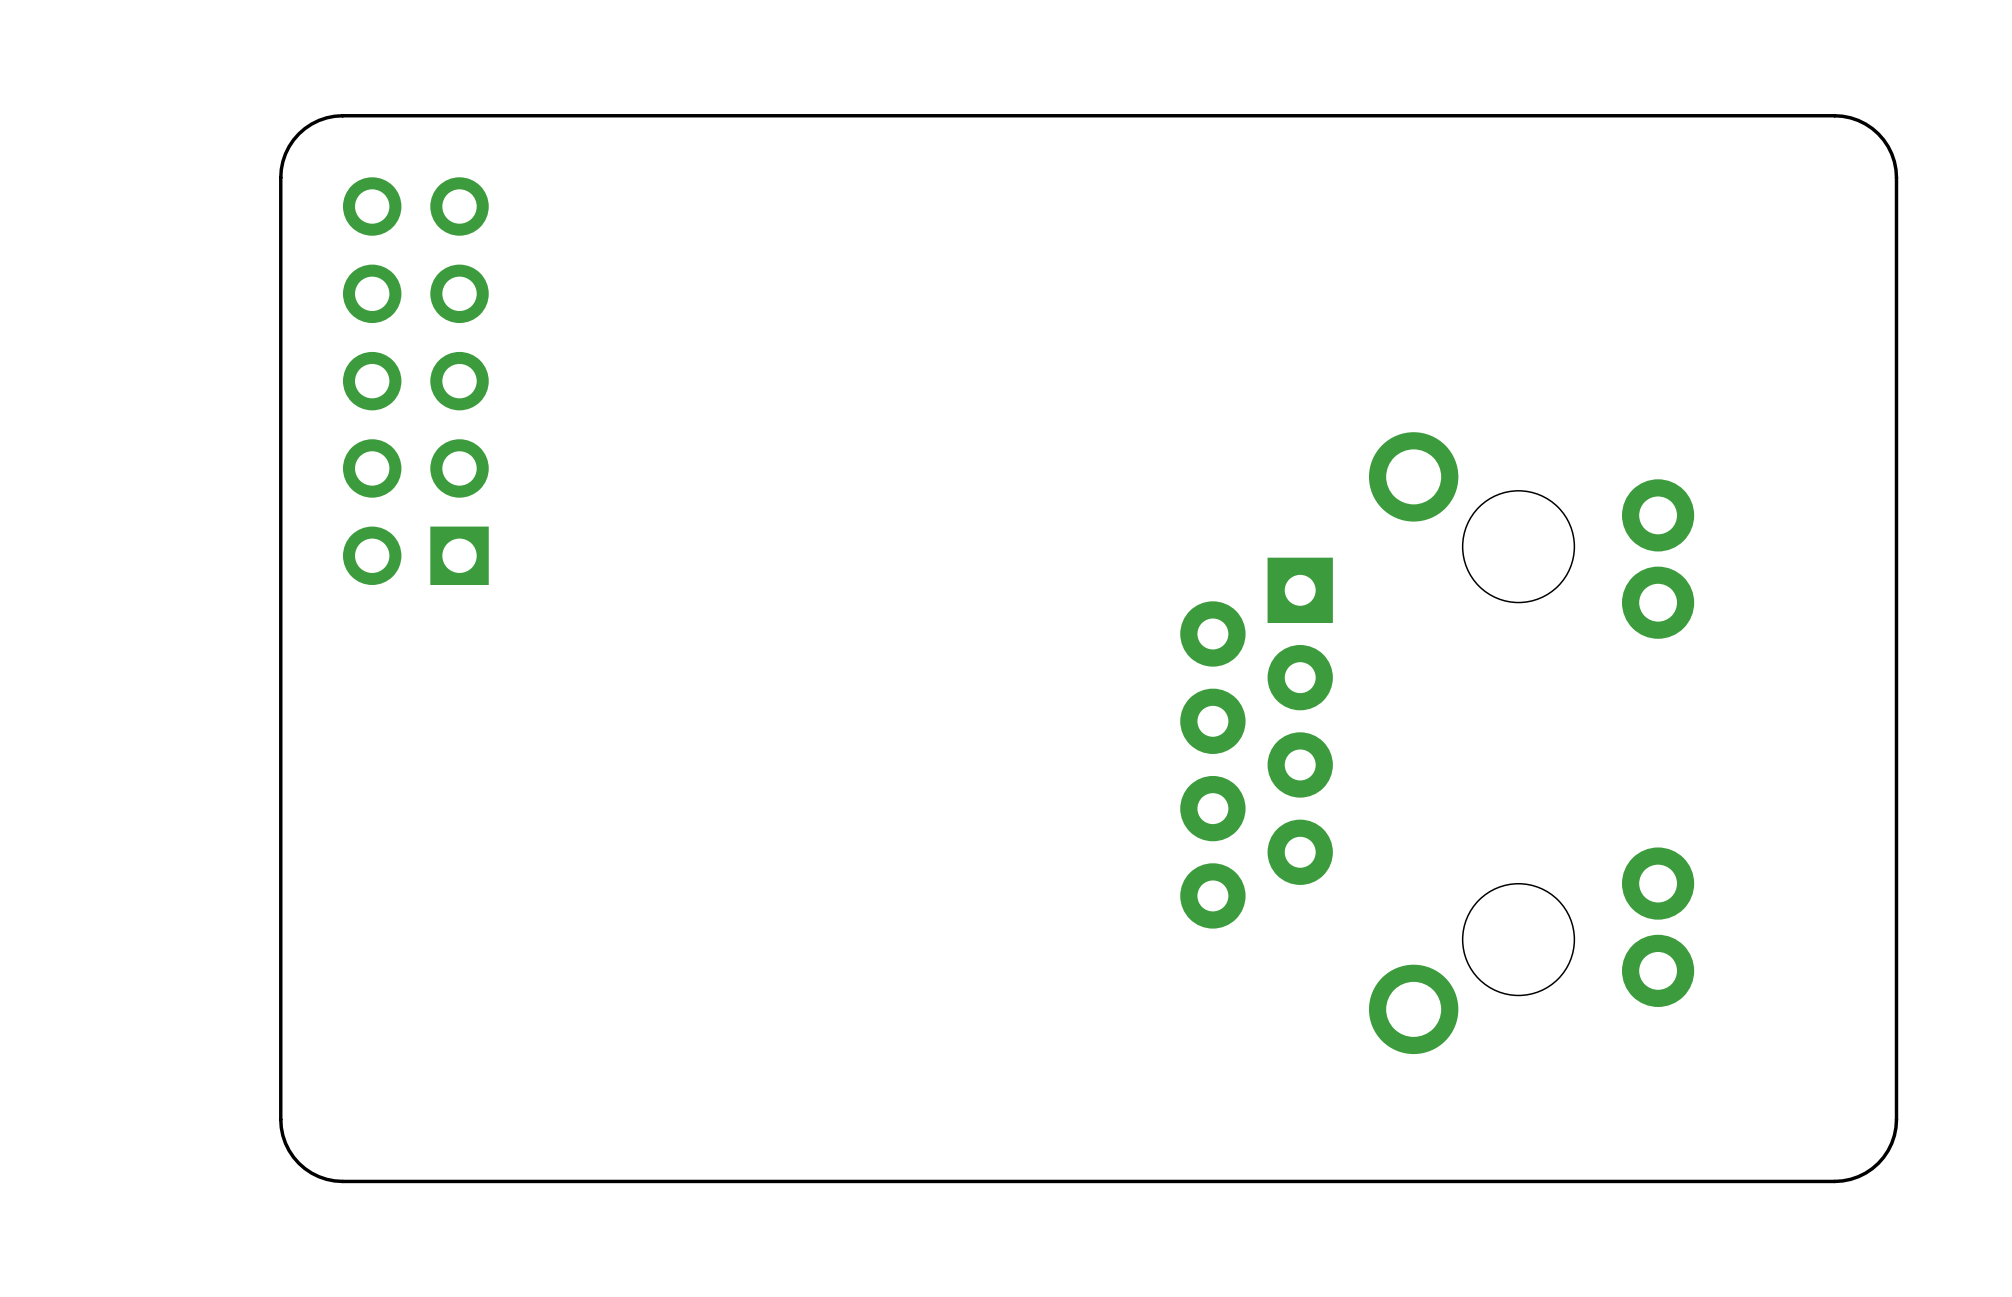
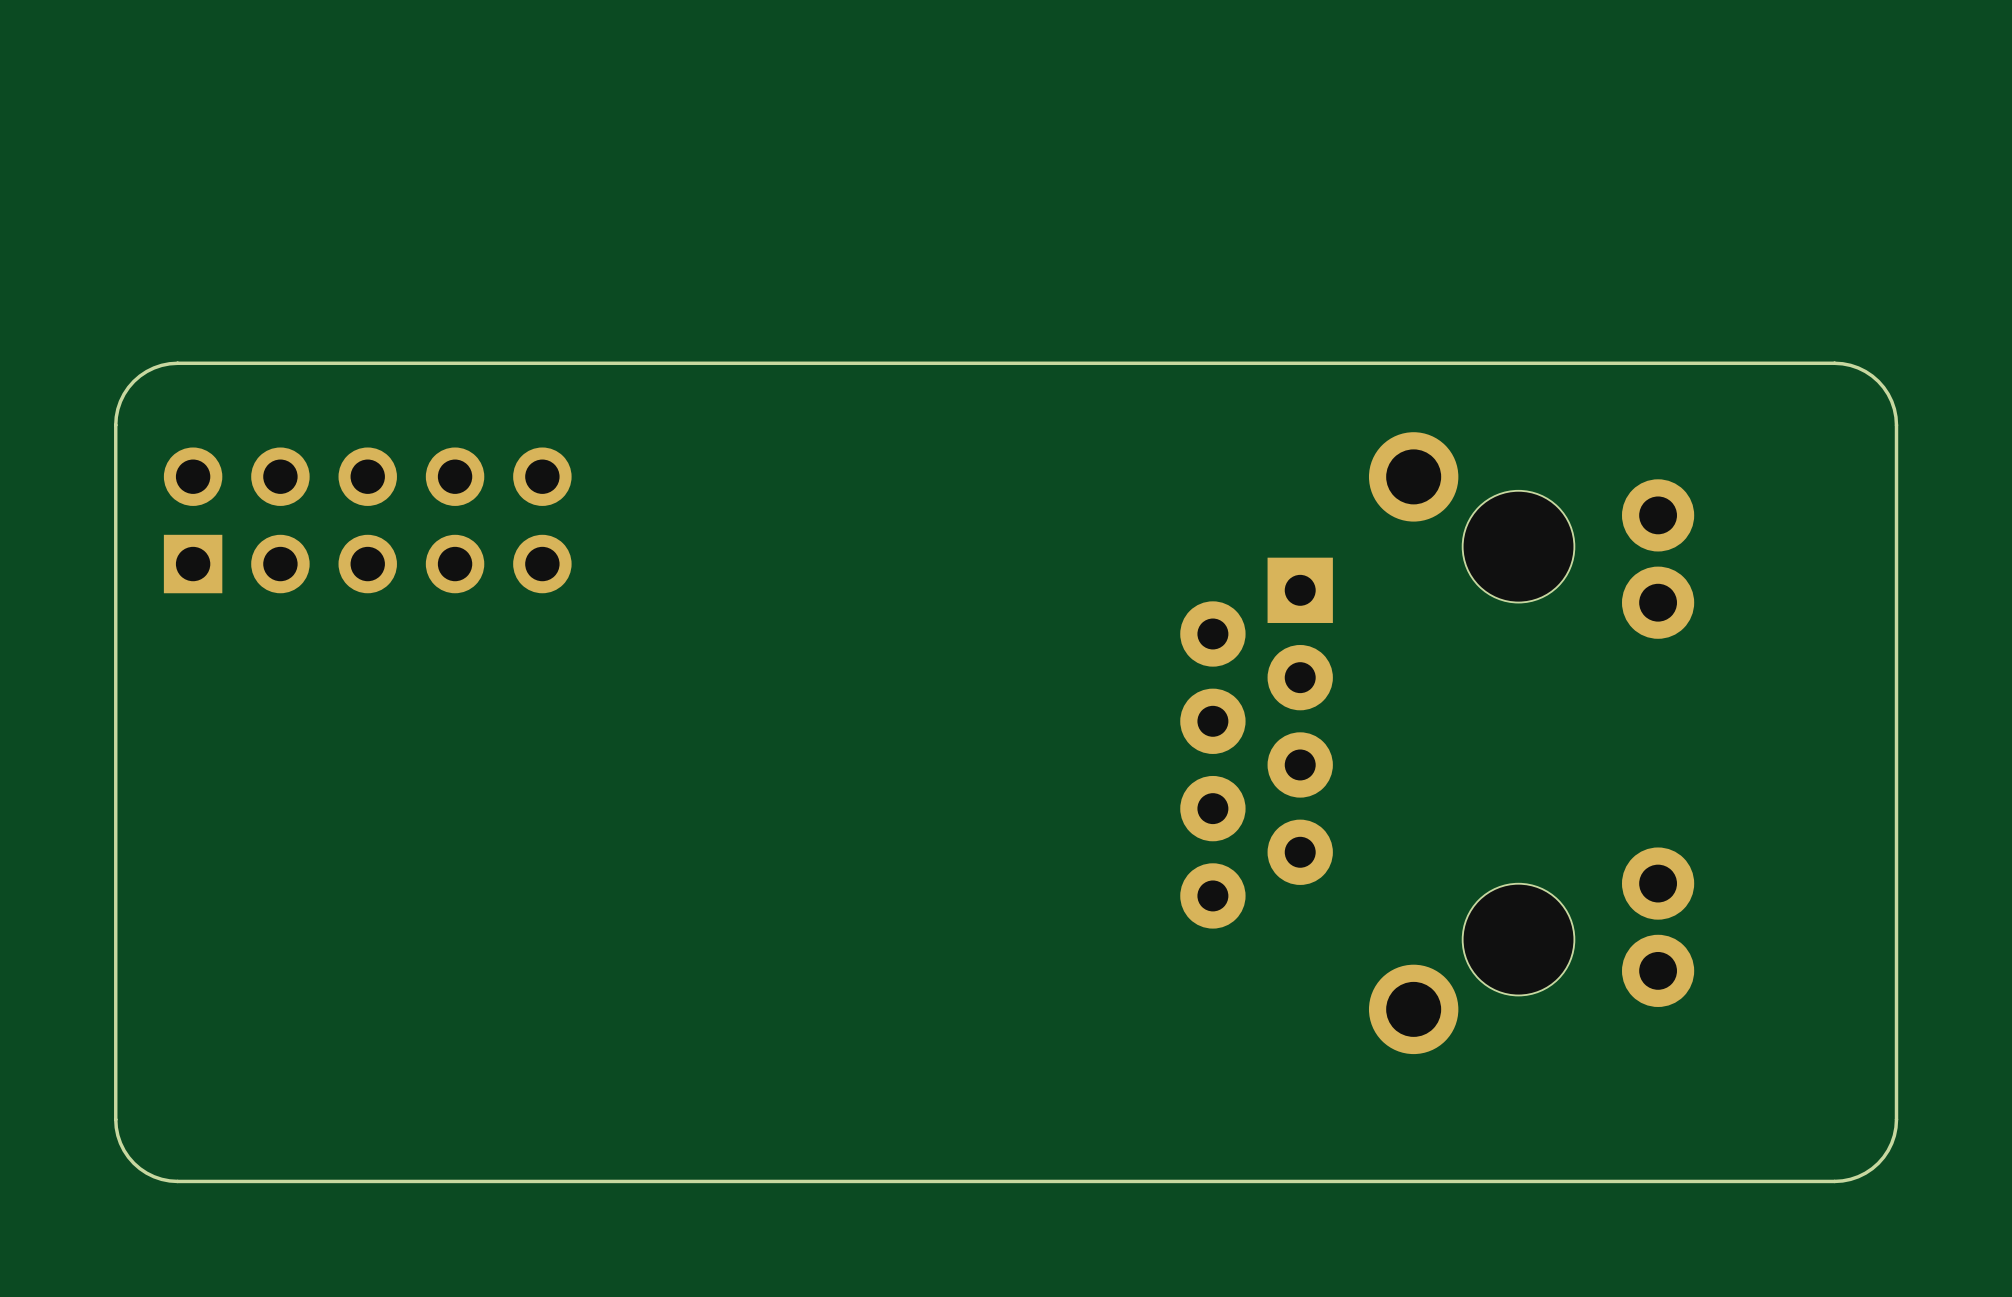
part rotation: 0° (415, 381) -> 90° clockwise (367, 520)
board edge: (1896, 425) (1895, 169) (1891, 153) (1878, 133) (1858, 120) (1842, 116) (342, 115) (318, 120) (304, 128) (293, 139) (285, 153) (280, 177) (280, 1119) (285, 1143) (298, 1163) (318, 1176) (342, 1181) -> (1896, 425) (1891, 401) (1878, 381) (1858, 367) (1834, 363) (177, 363) (153, 367) (139, 376) (128, 387) (120, 401) (115, 425) (115, 1119) (117, 1135) (124, 1150) (133, 1163) (146, 1173) (161, 1179) (177, 1181) (342, 1181)

